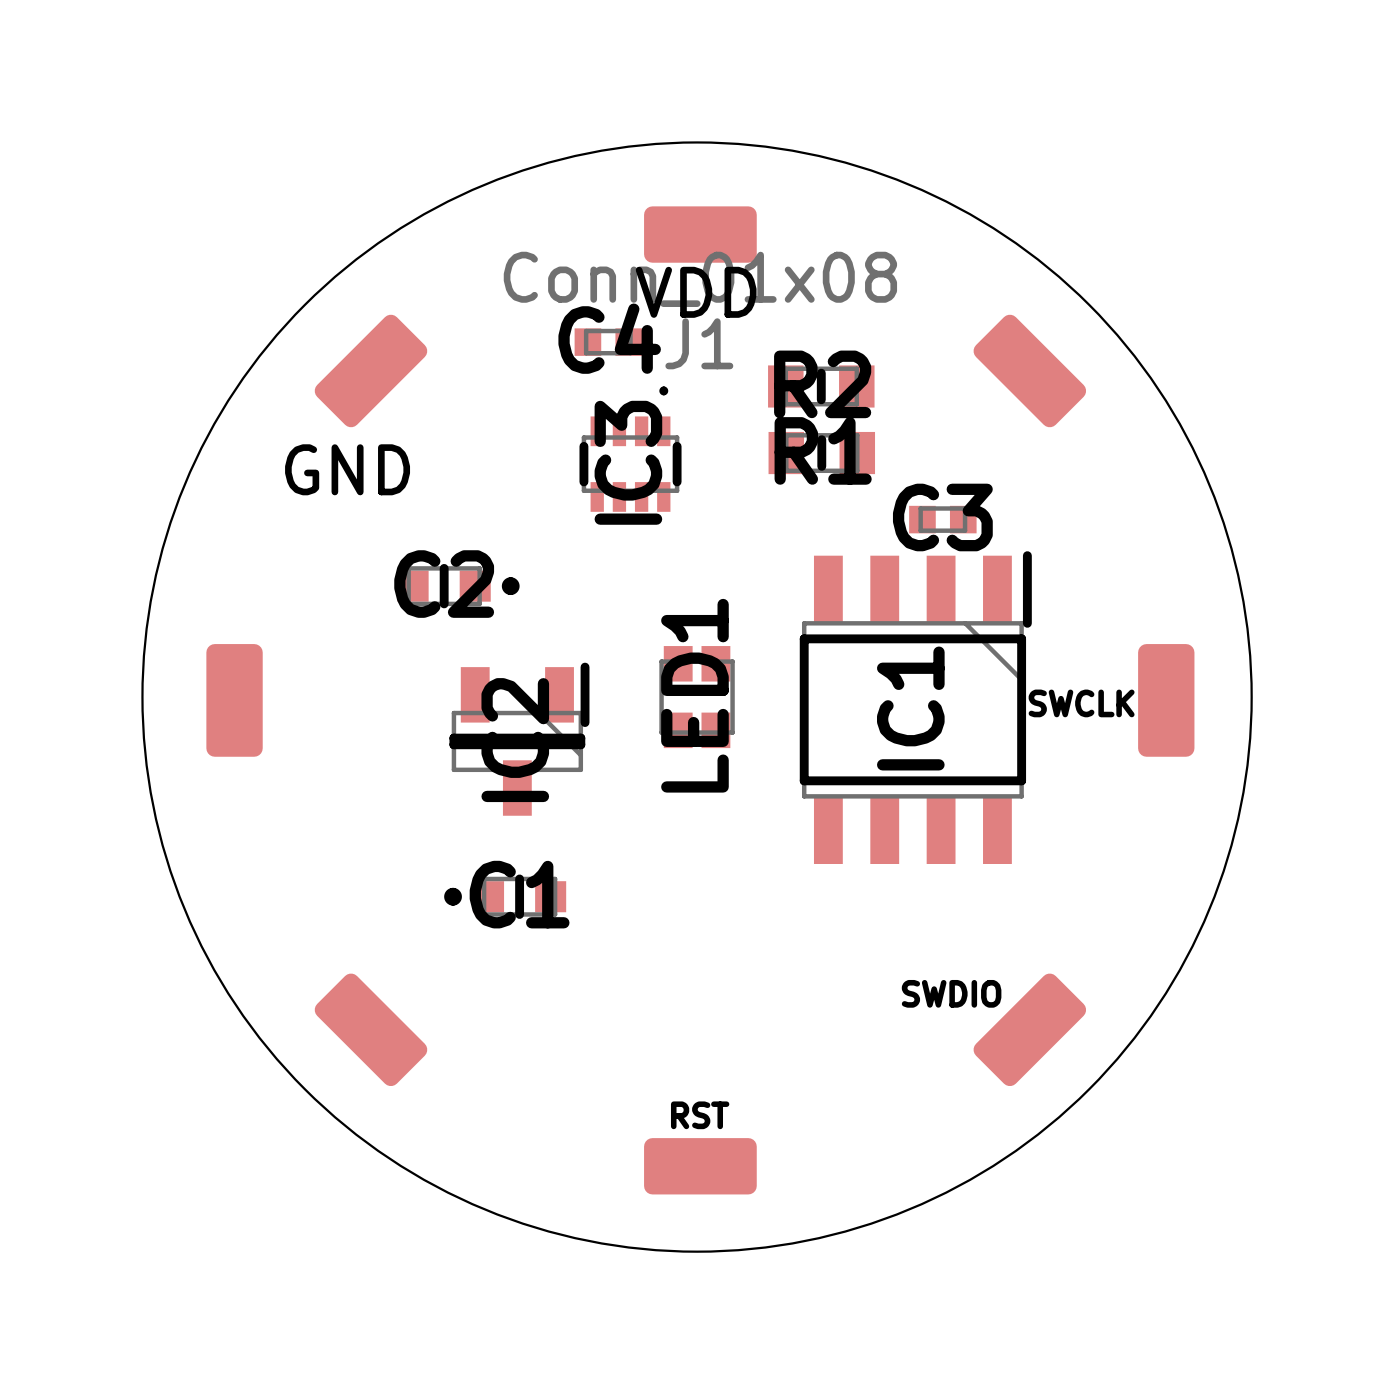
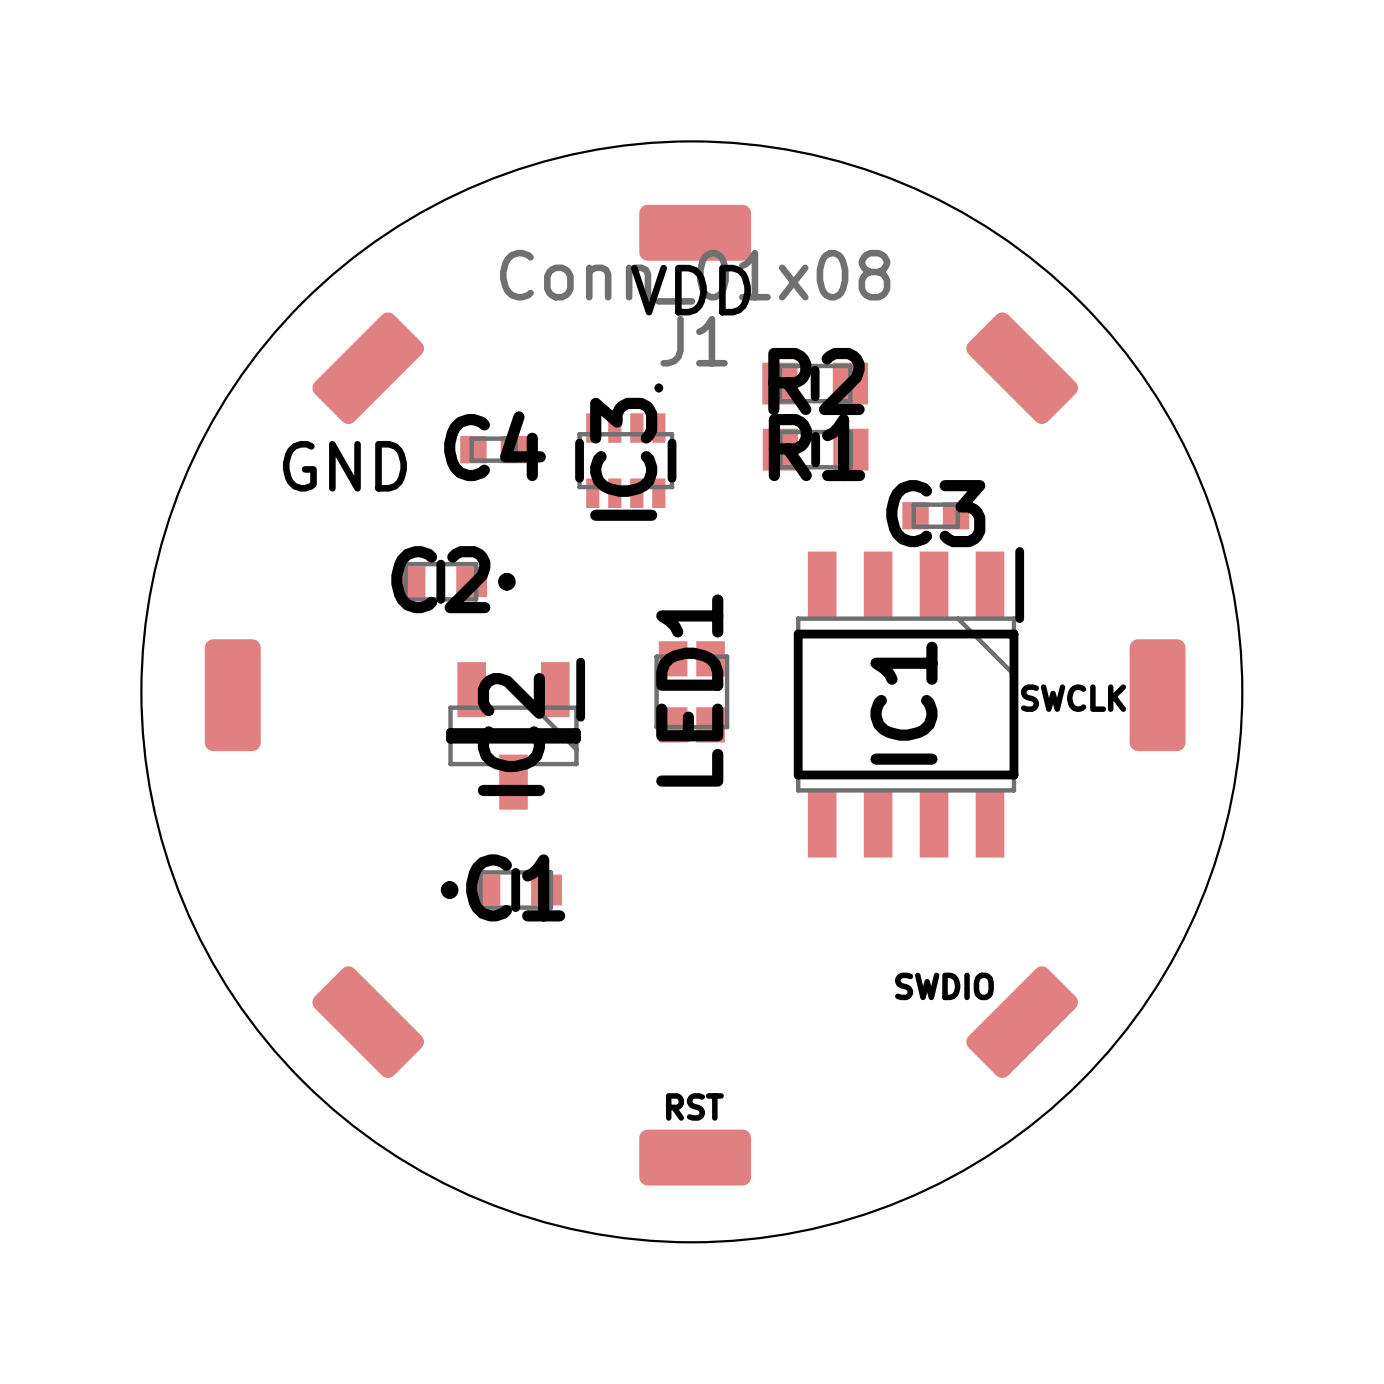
C4 position: (608, 342) -> (493, 449)

